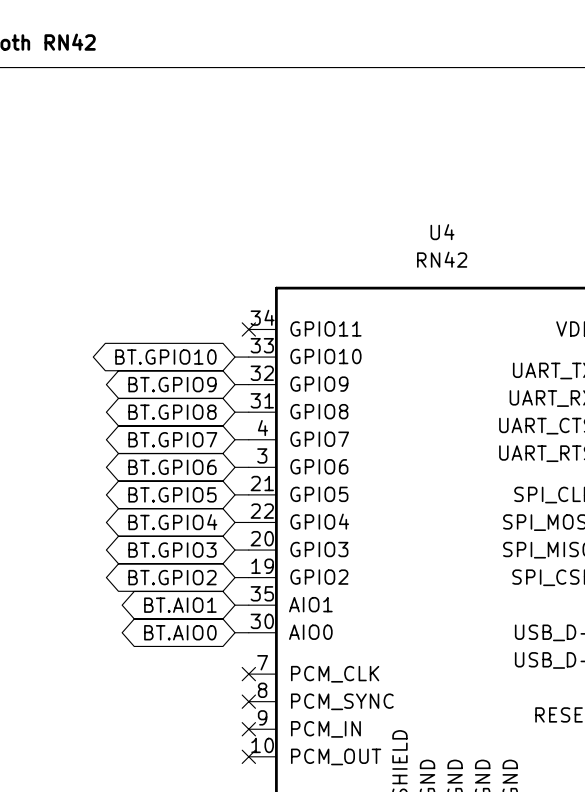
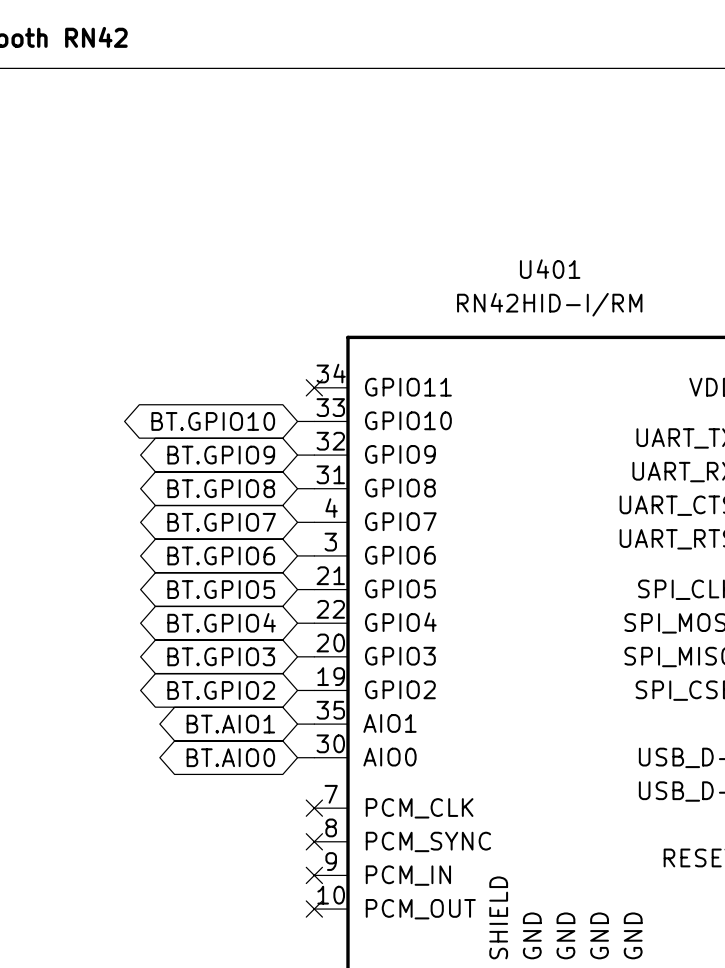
U4 name: U4 (442, 232) -> U401 (550, 269)
U4 value: RN42 (442, 259) -> RN42HID-I/RM (549, 304)

